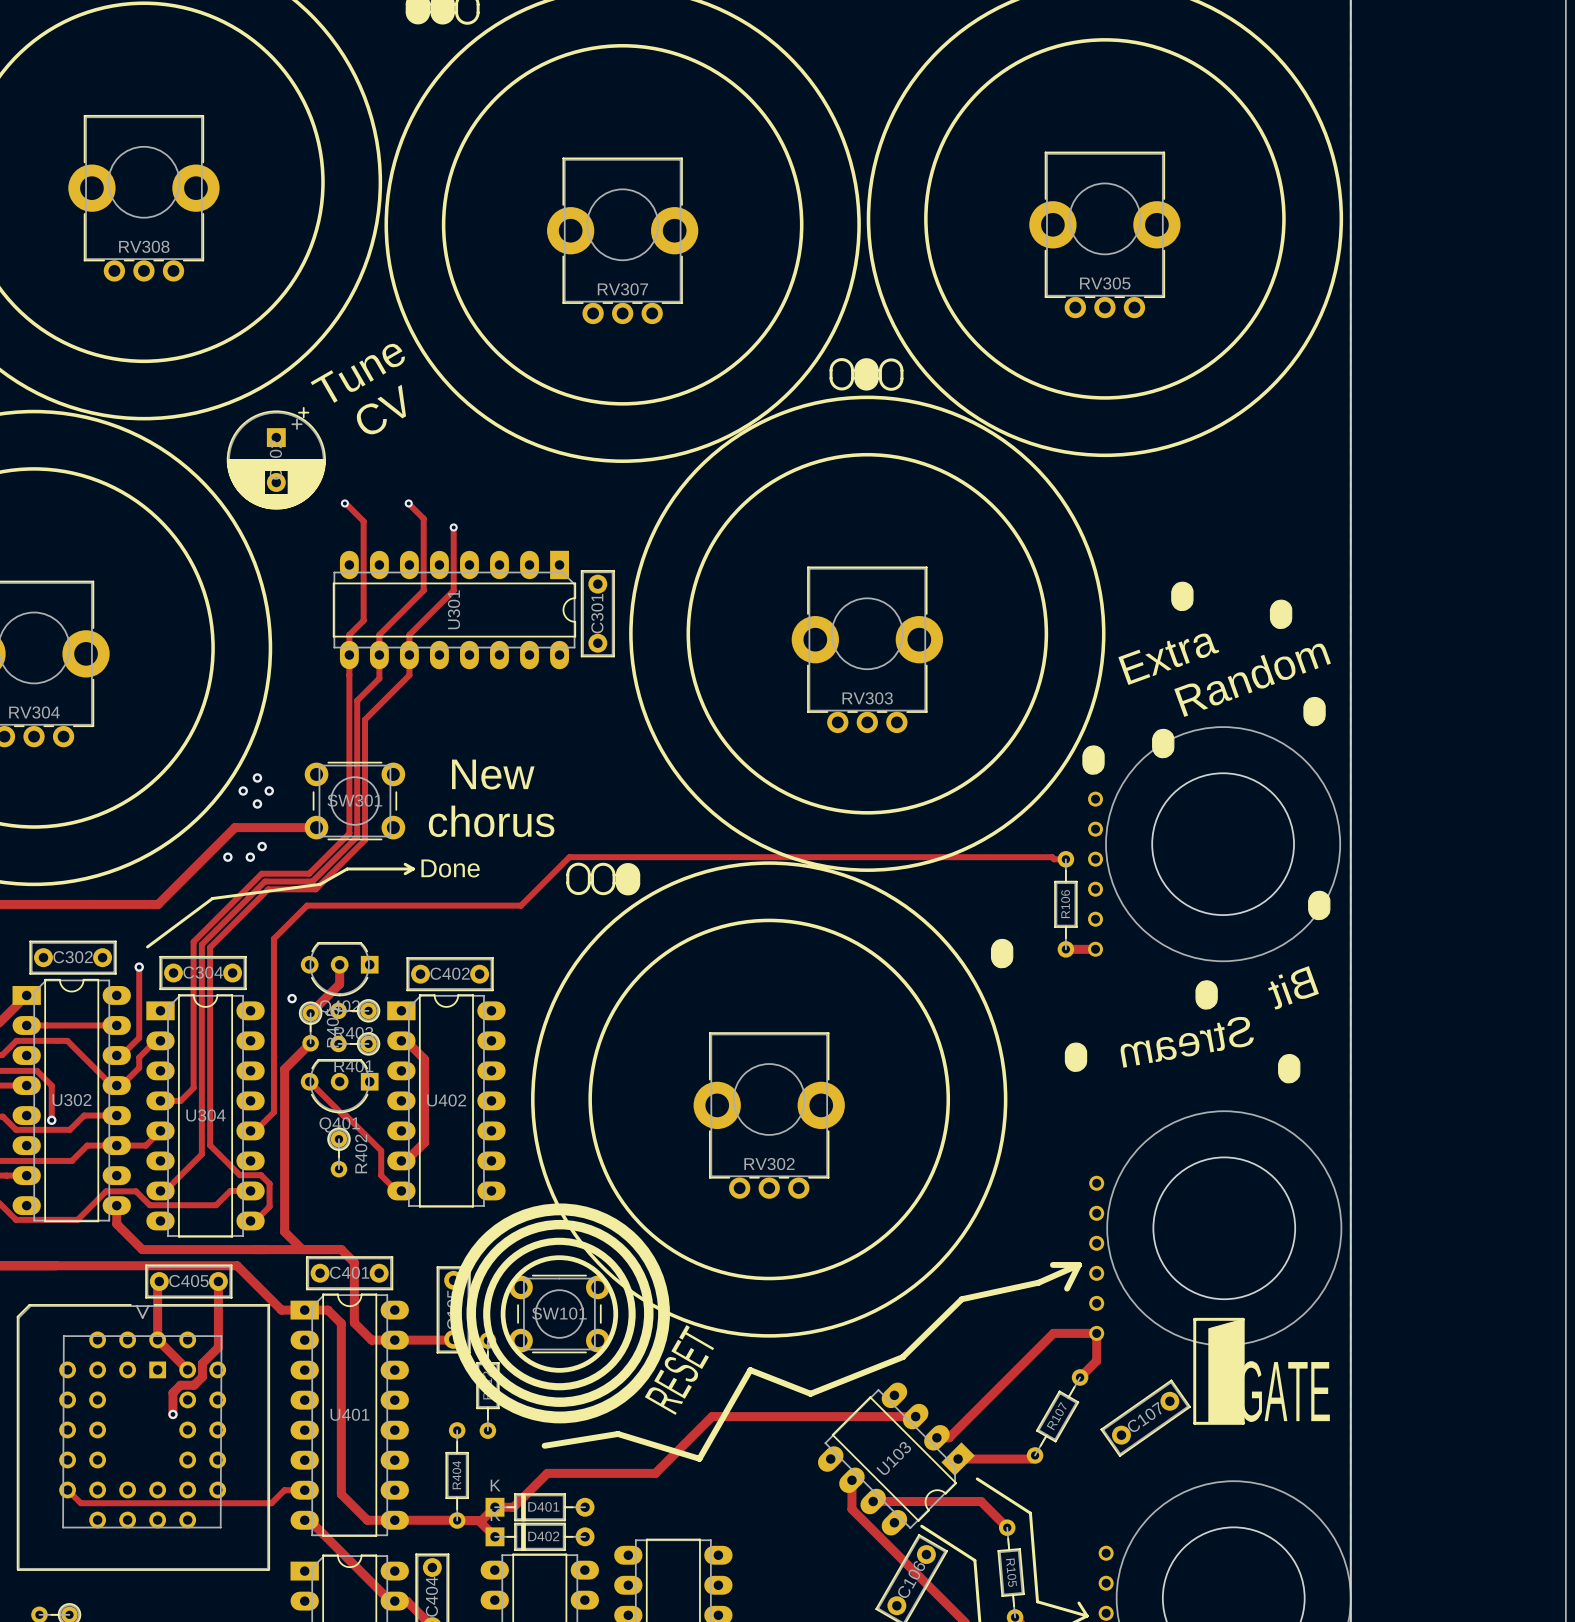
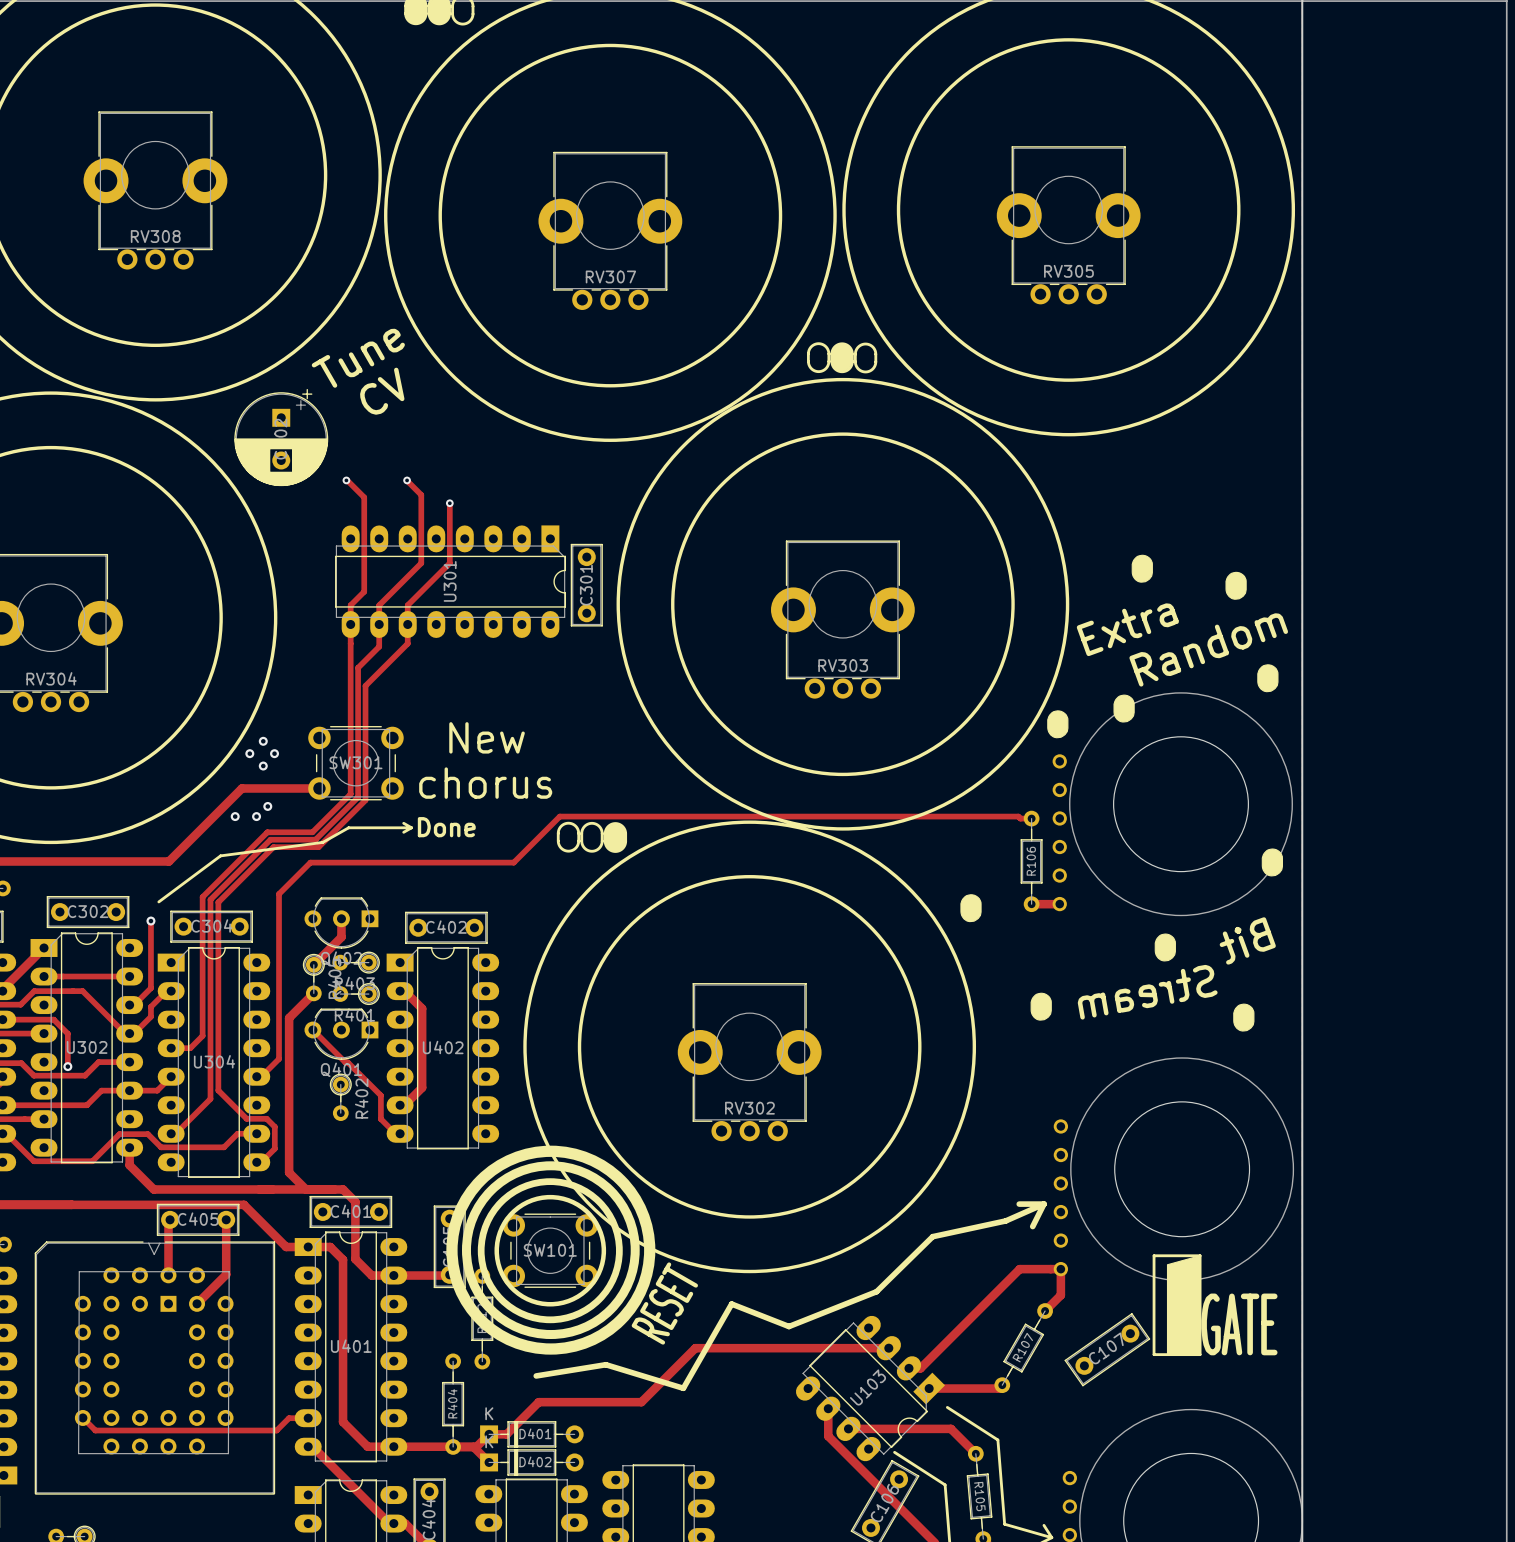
via: (292, 998) -> none
track: (157, 1339) (187, 1369) -> none
track: (218, 1339) (218, 1347) (202, 1363) (202, 1376) (194, 1385) (180, 1385) (172, 1392) (172, 1414) -> (226, 1274) (197, 1303)
via: (172, 1414) -> none

